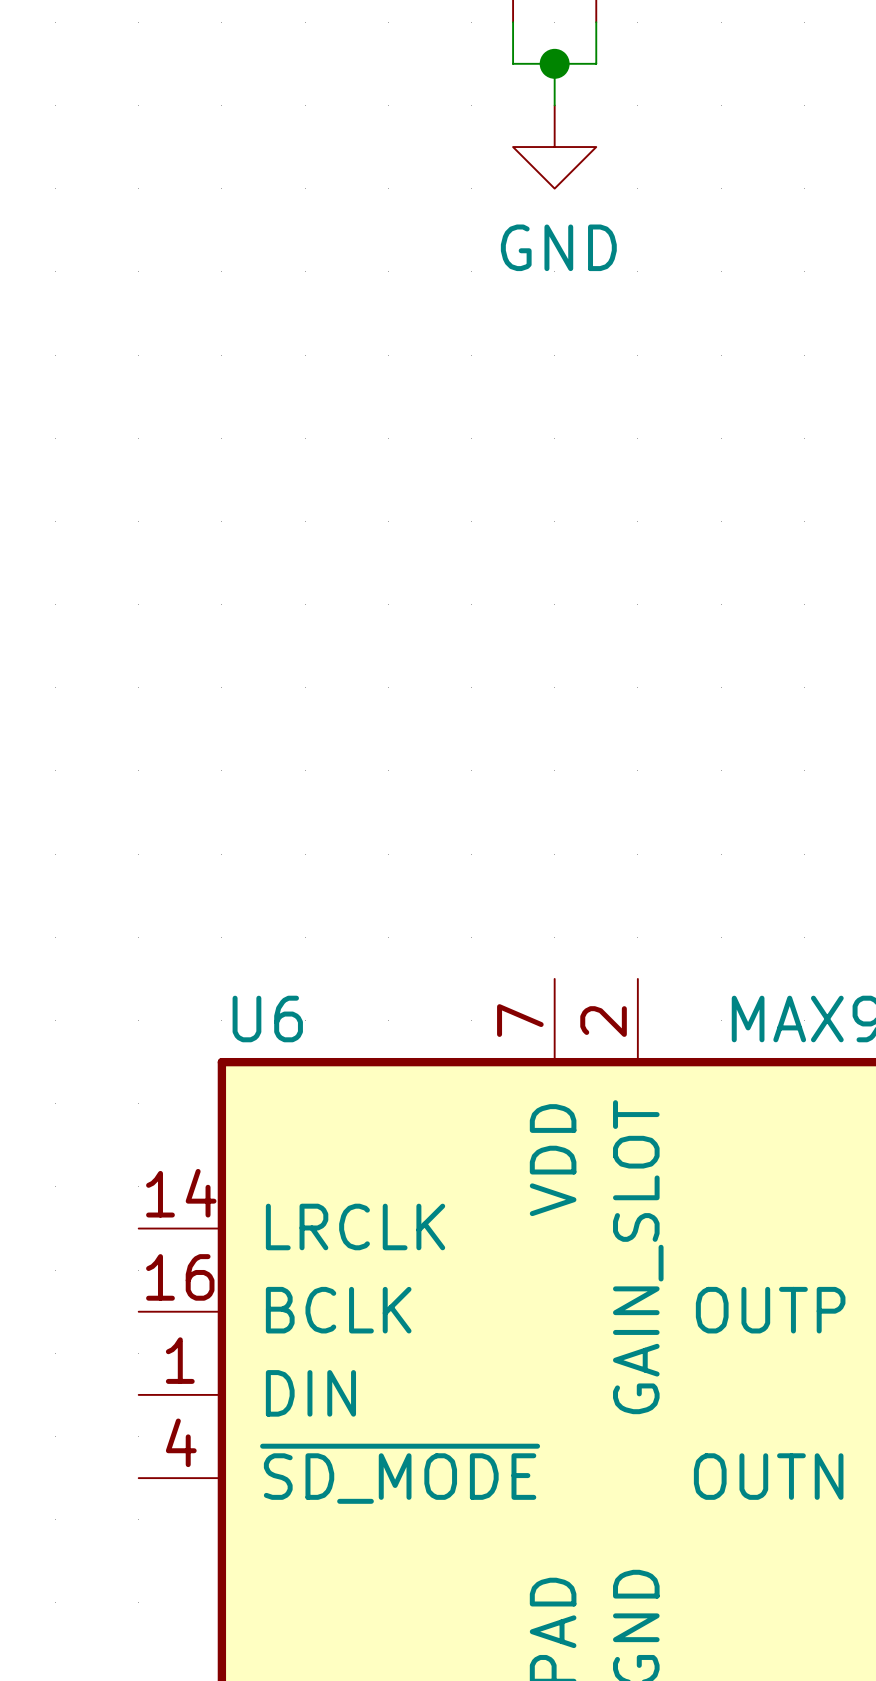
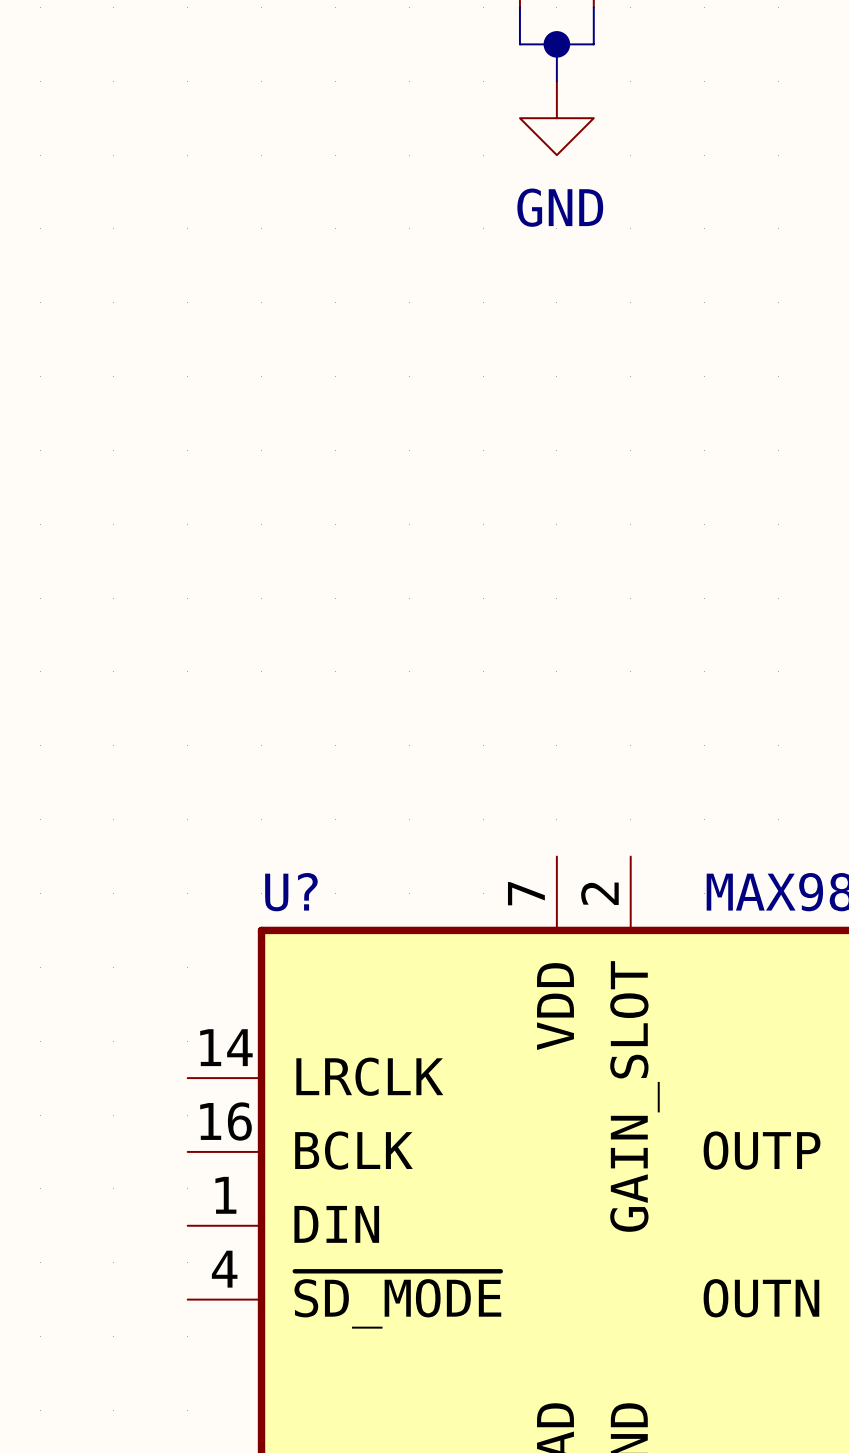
U6 name: U6 (267, 1019) -> U? (291, 892)

